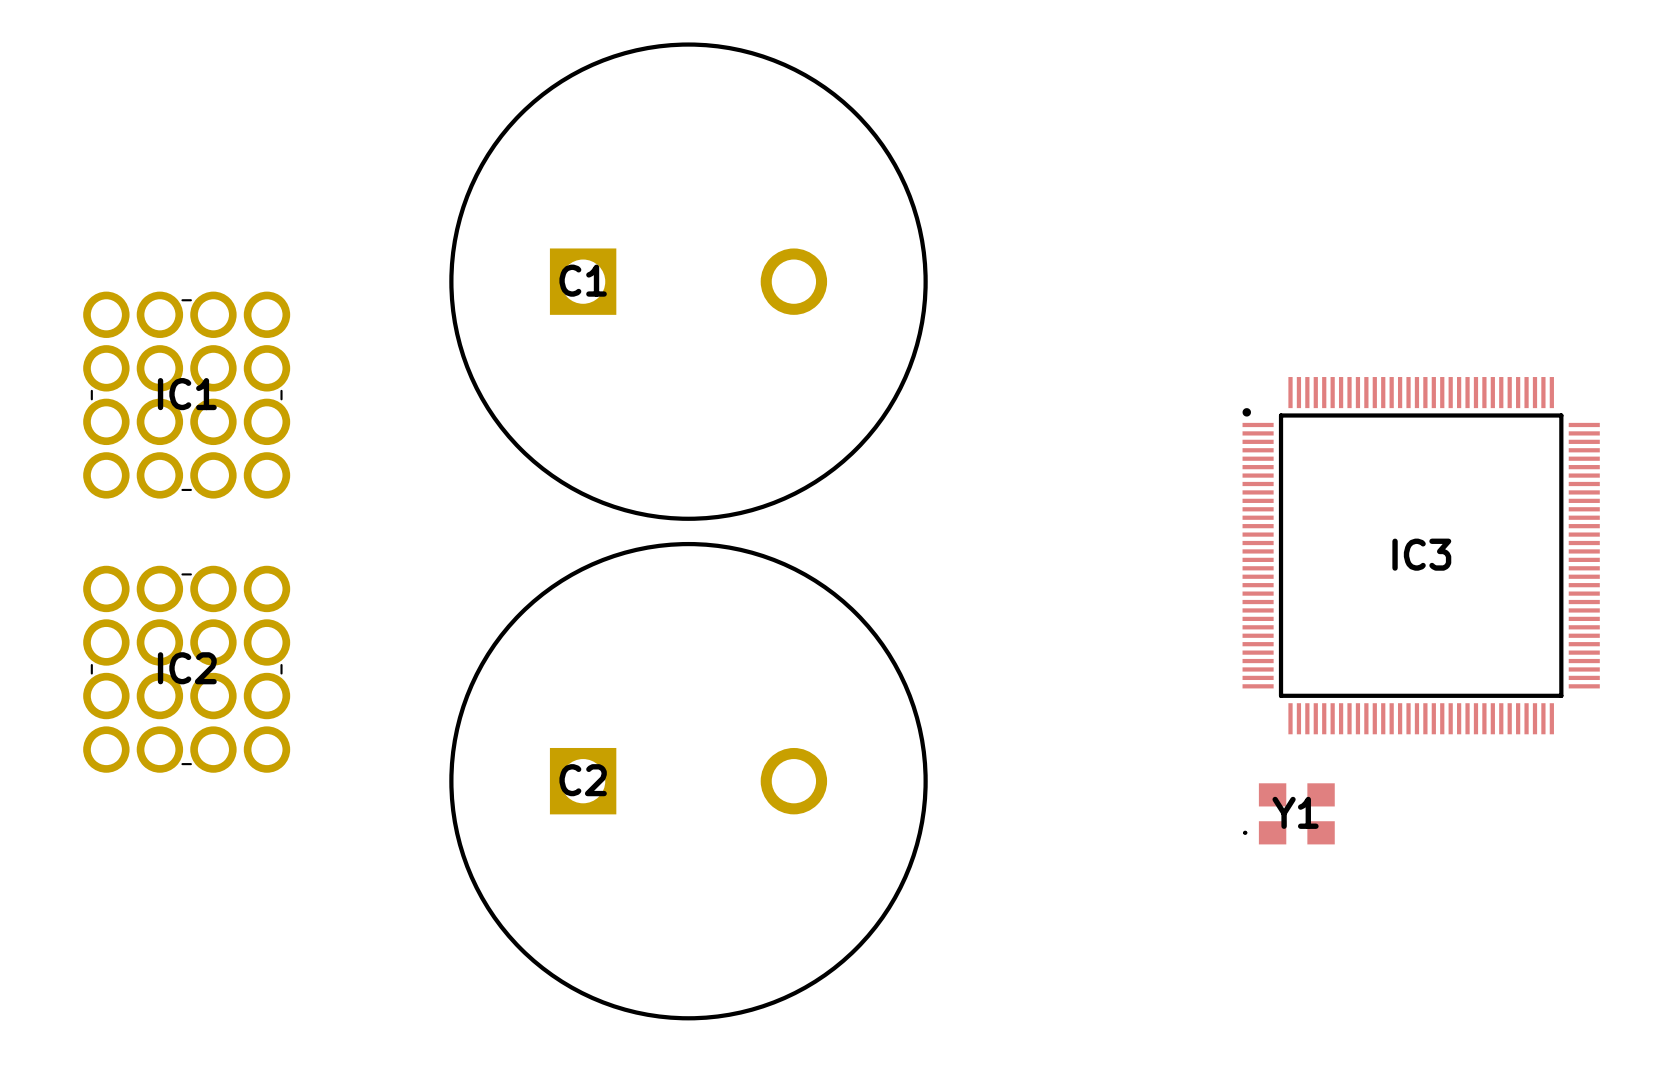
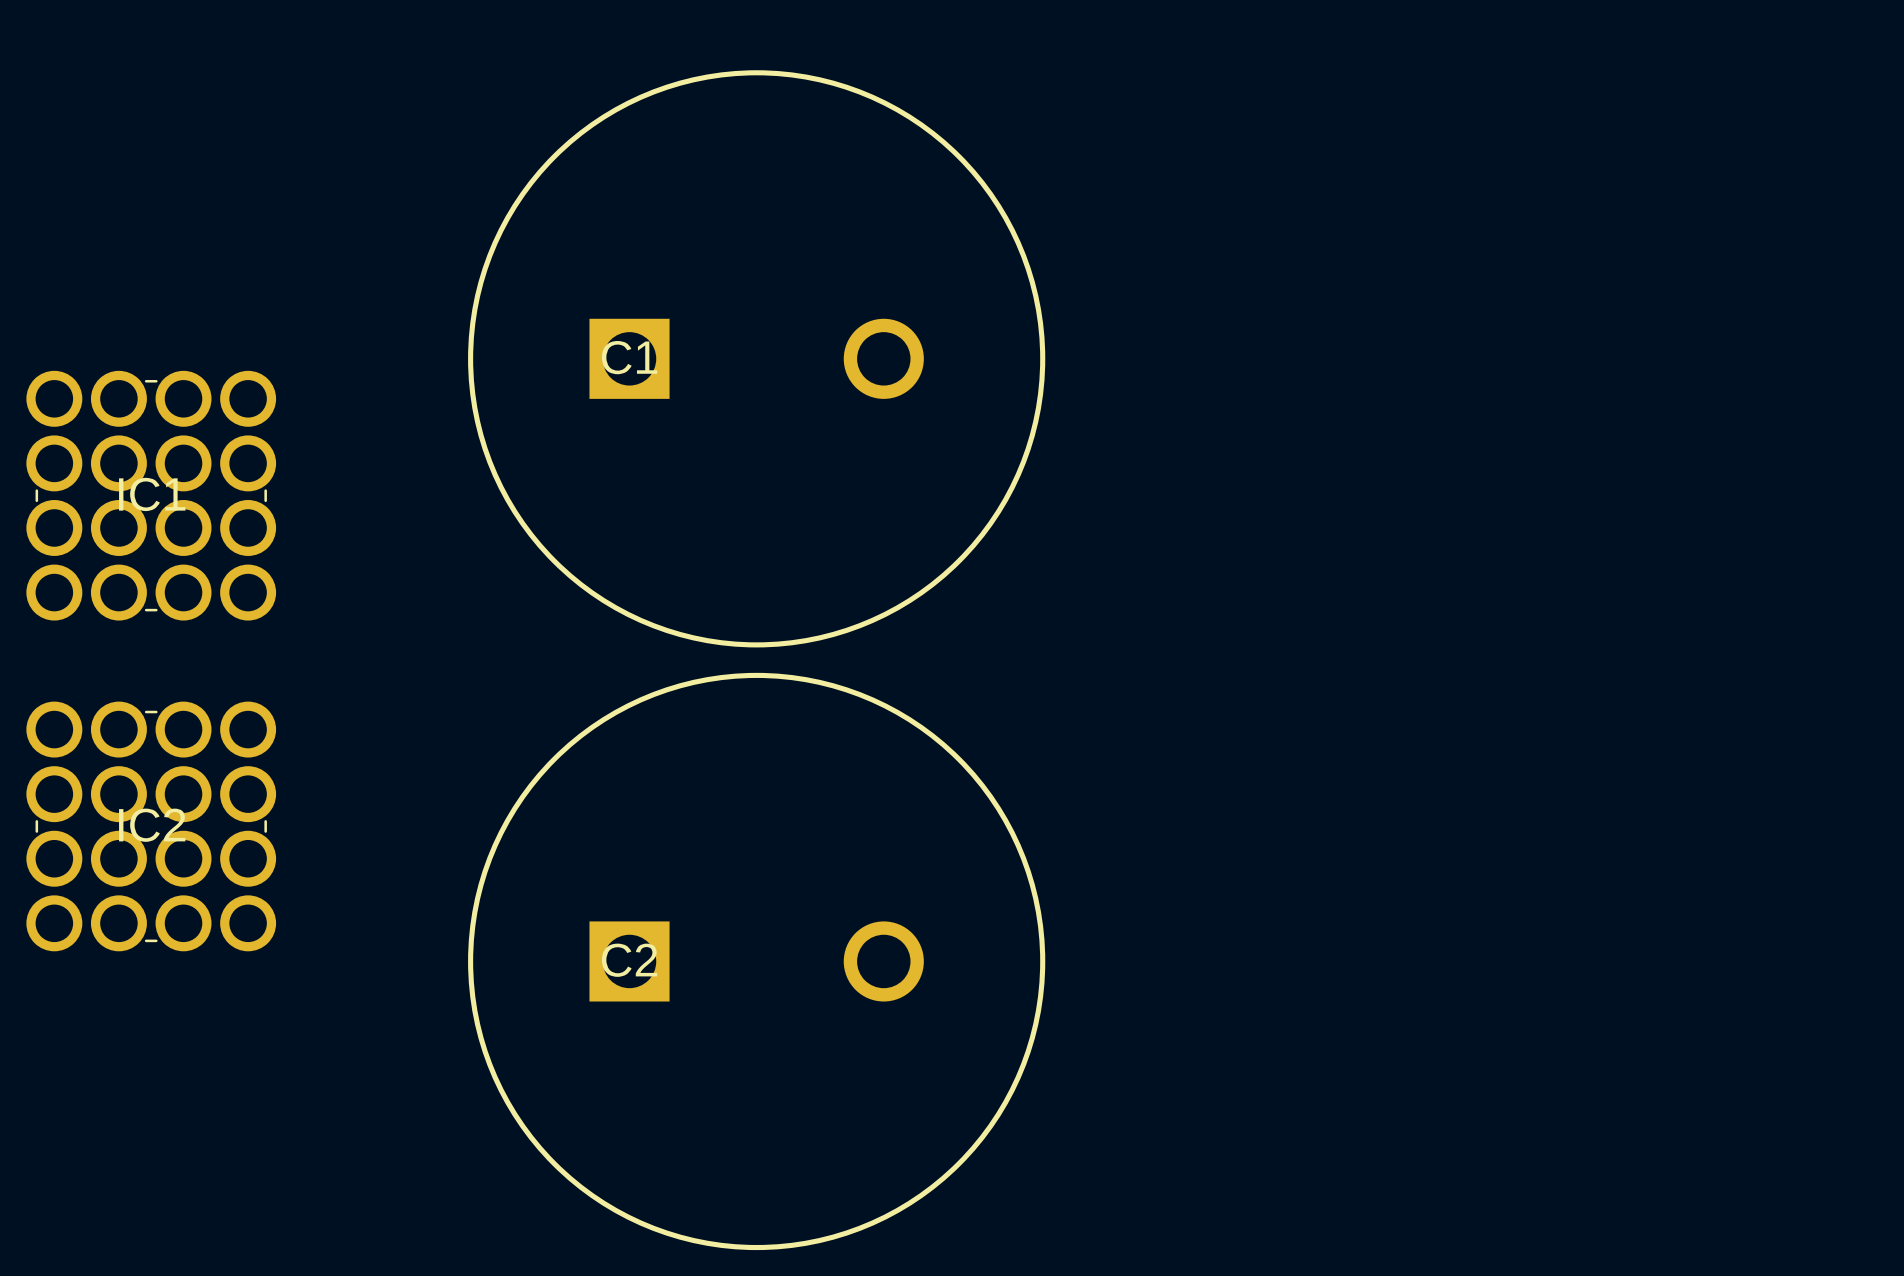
IC3: (1421, 555) -> none
Y1: (1288, 813) -> none

